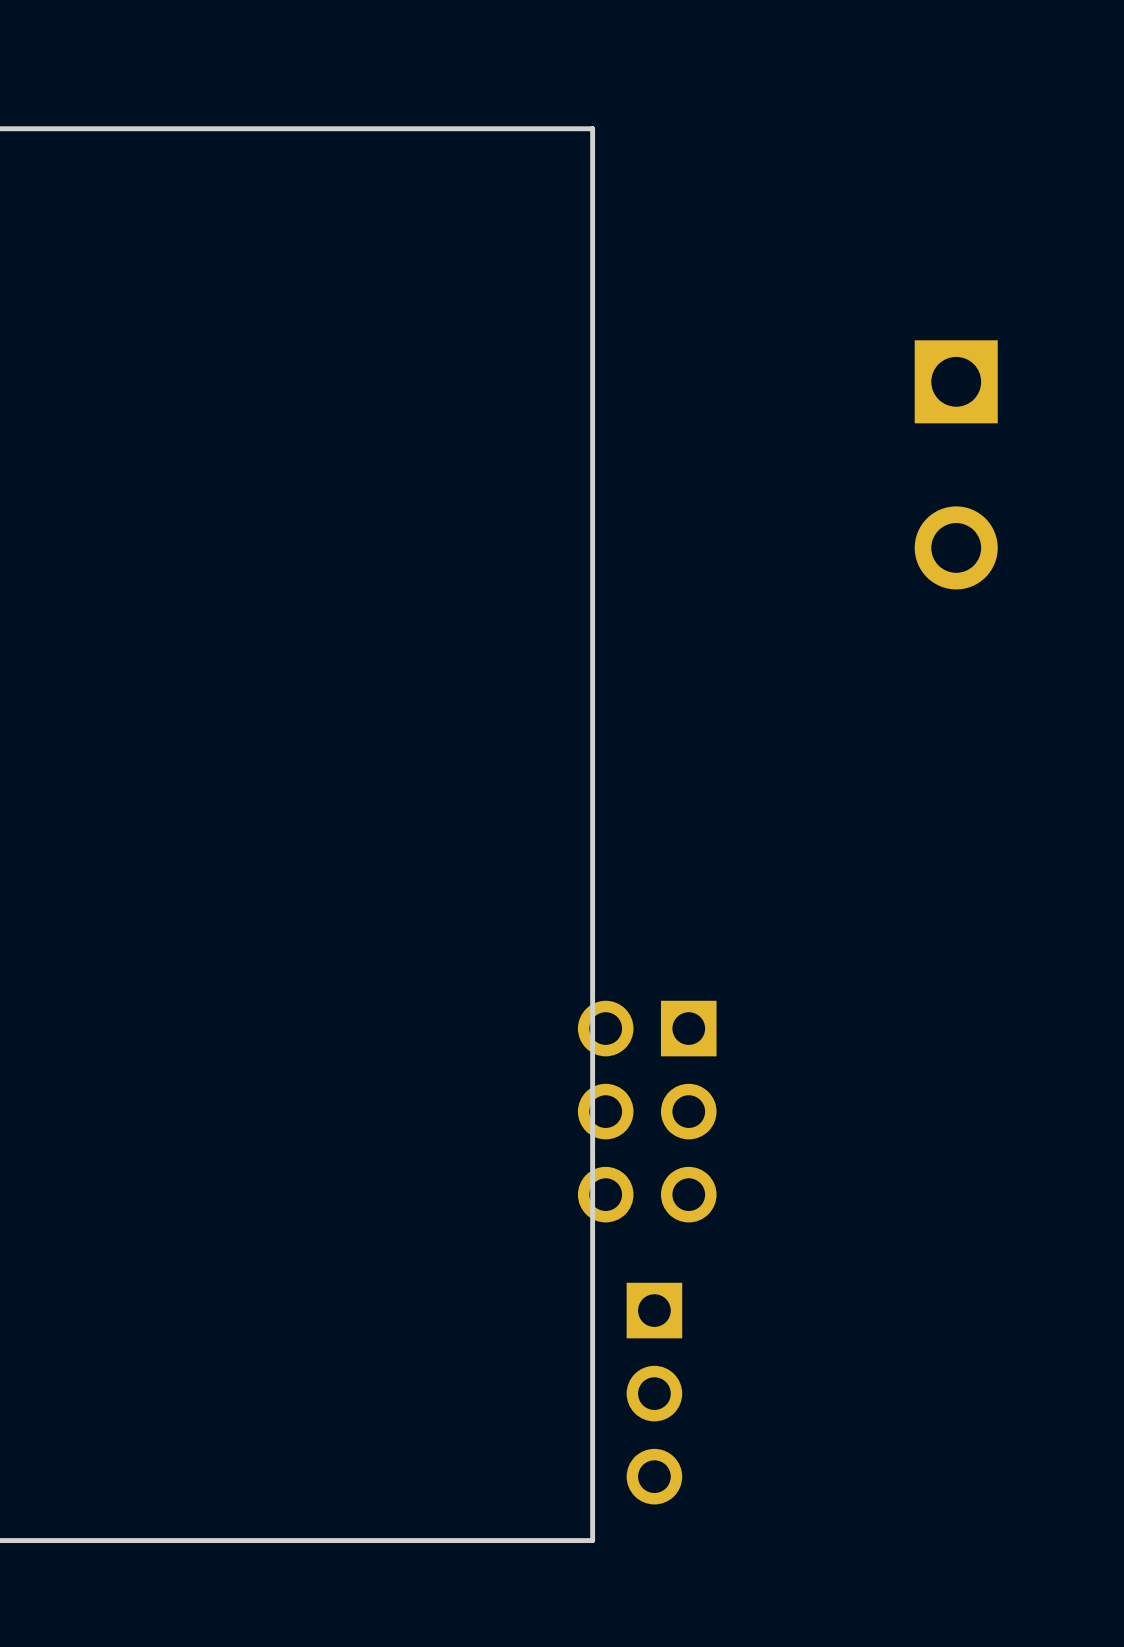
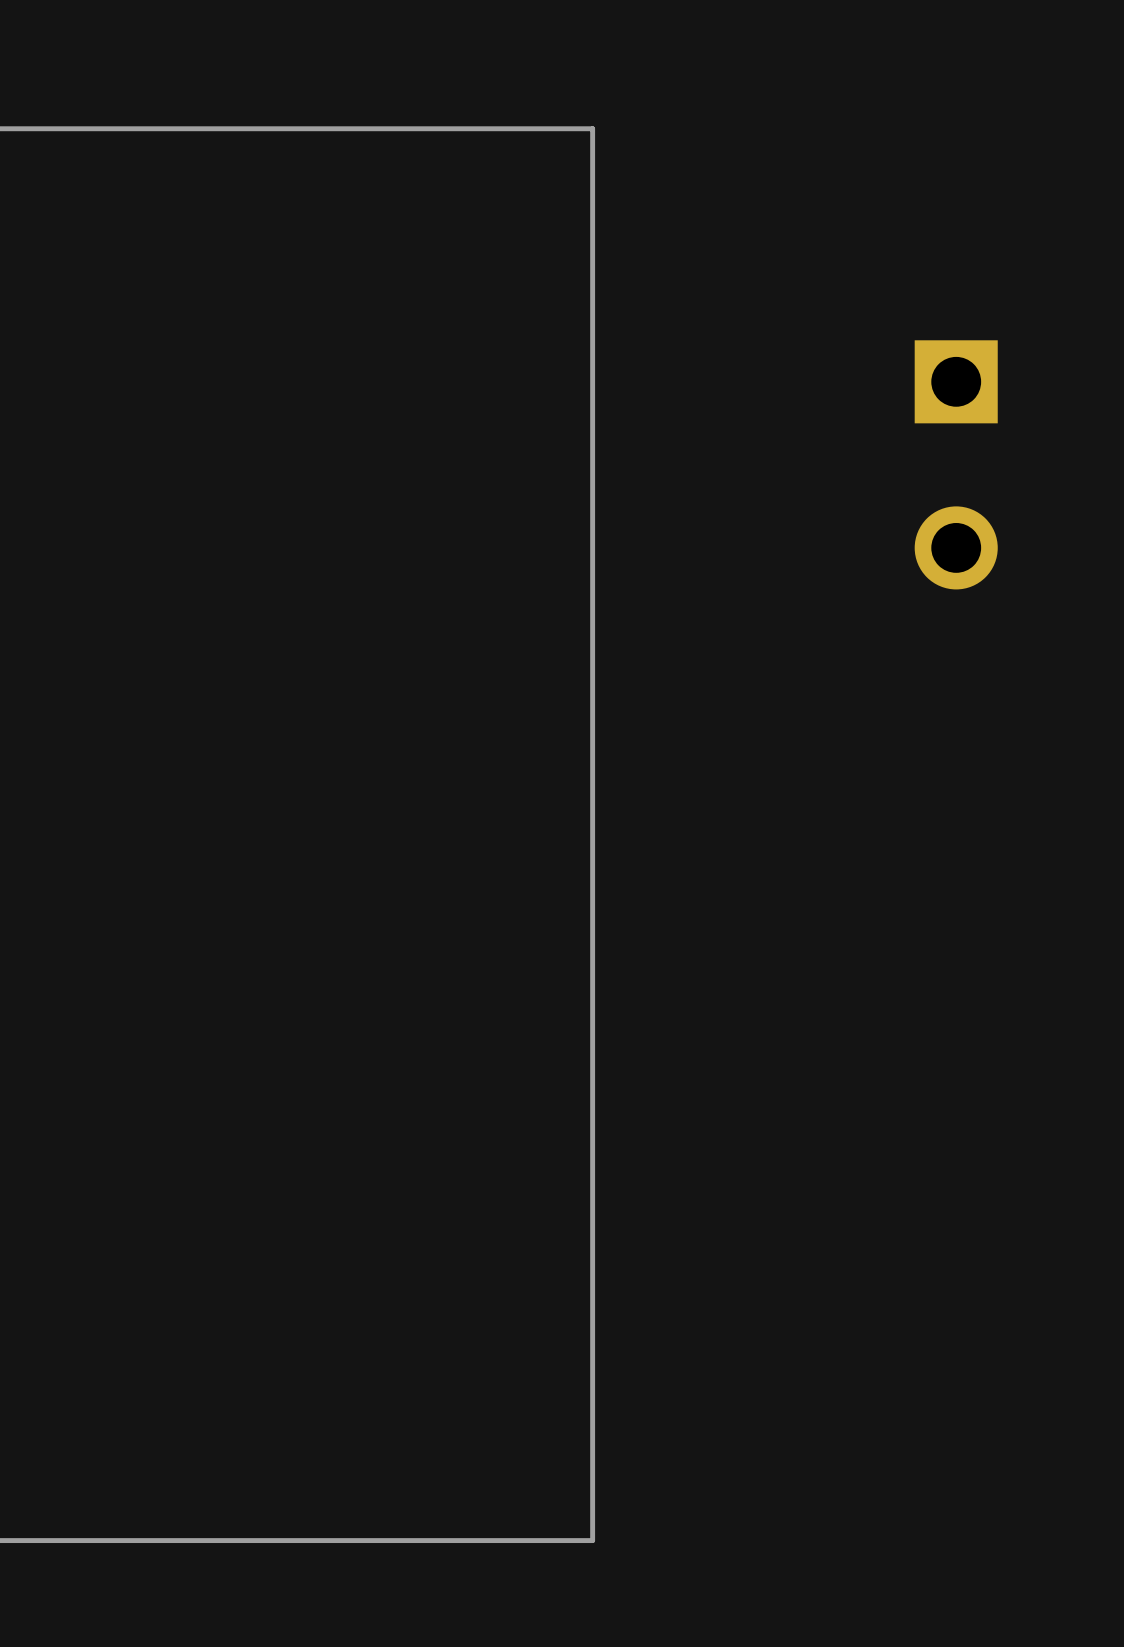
part: (647, 1111) -> none
part: (654, 1393) -> none

